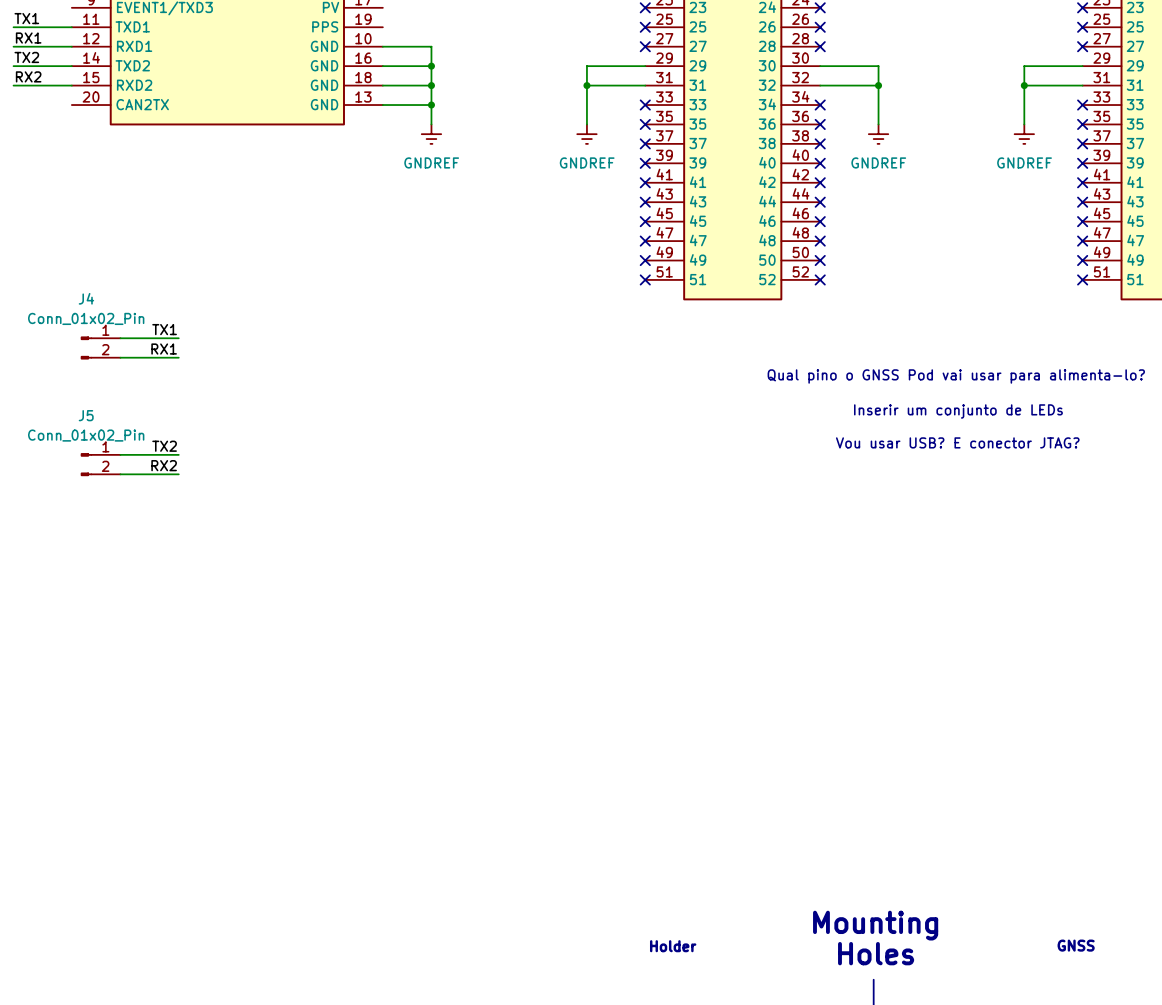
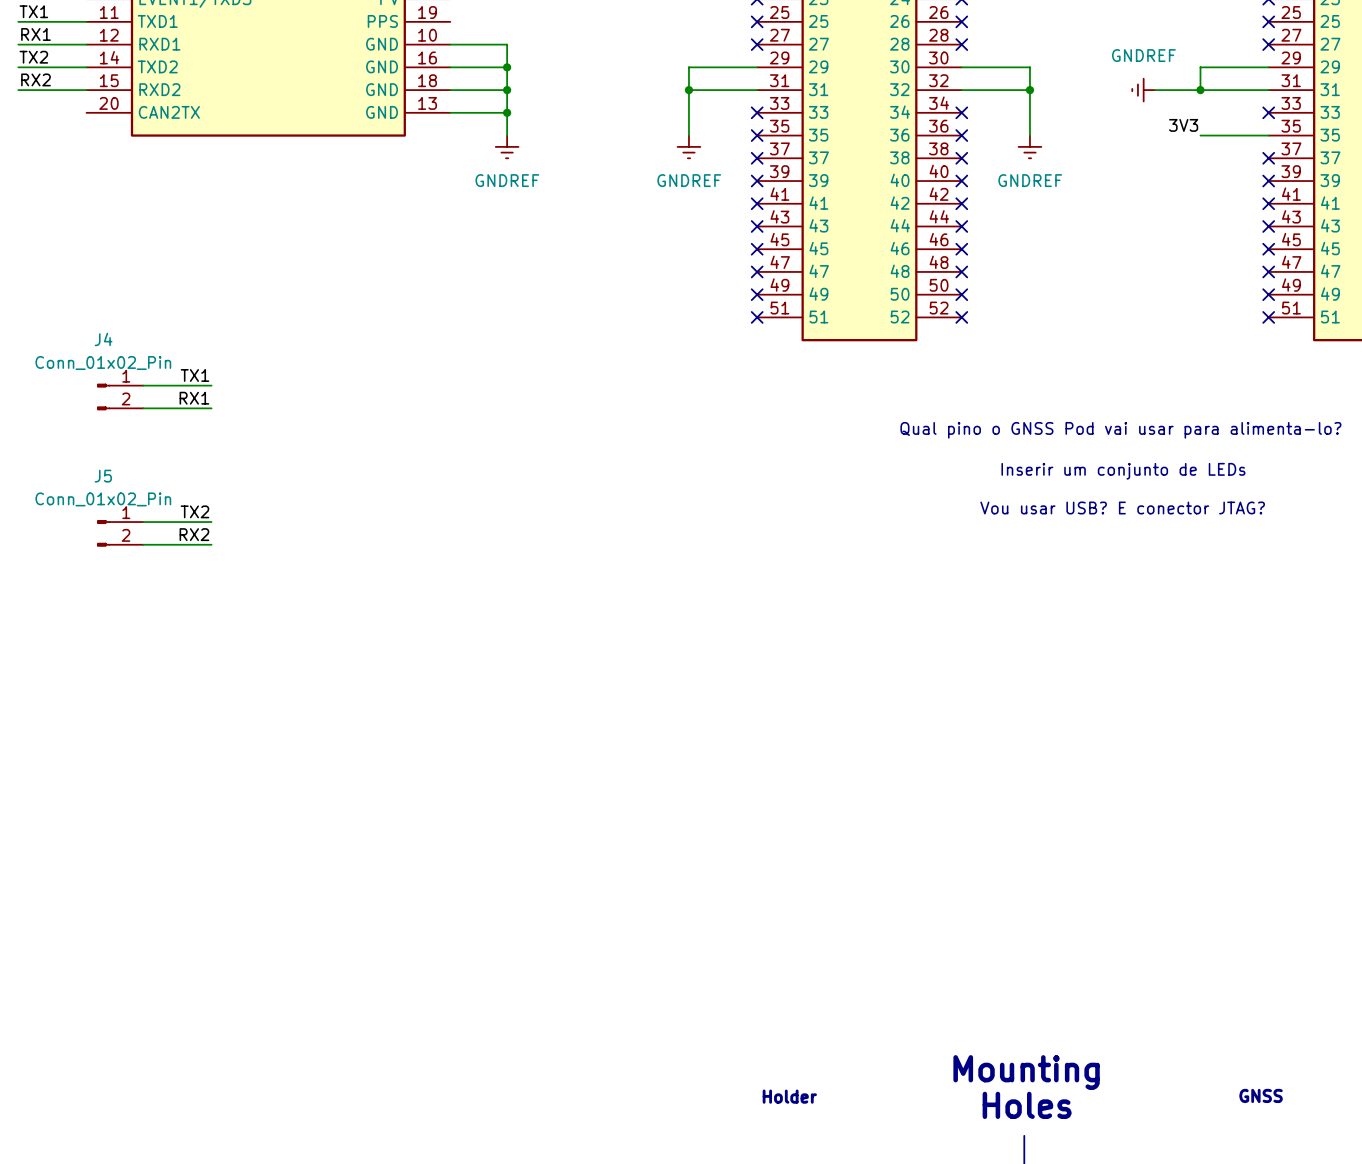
wire: (1024, 85) (1024, 124) -> (1200, 90) (1155, 90)
label: none -> 3V3 (1183, 125)
wire: none -> (1200, 135) (1268, 135)
no-connect mark: (1082, 124) -> none
power symbol rotation: 0° (1024, 134) -> 90° clockwise (1143, 90)
power symbol position: GNDREF (1024, 134) -> GNDREF (1143, 90)
power symbol text position: GNDREF (1024, 162) -> GNDREF (1143, 55)

